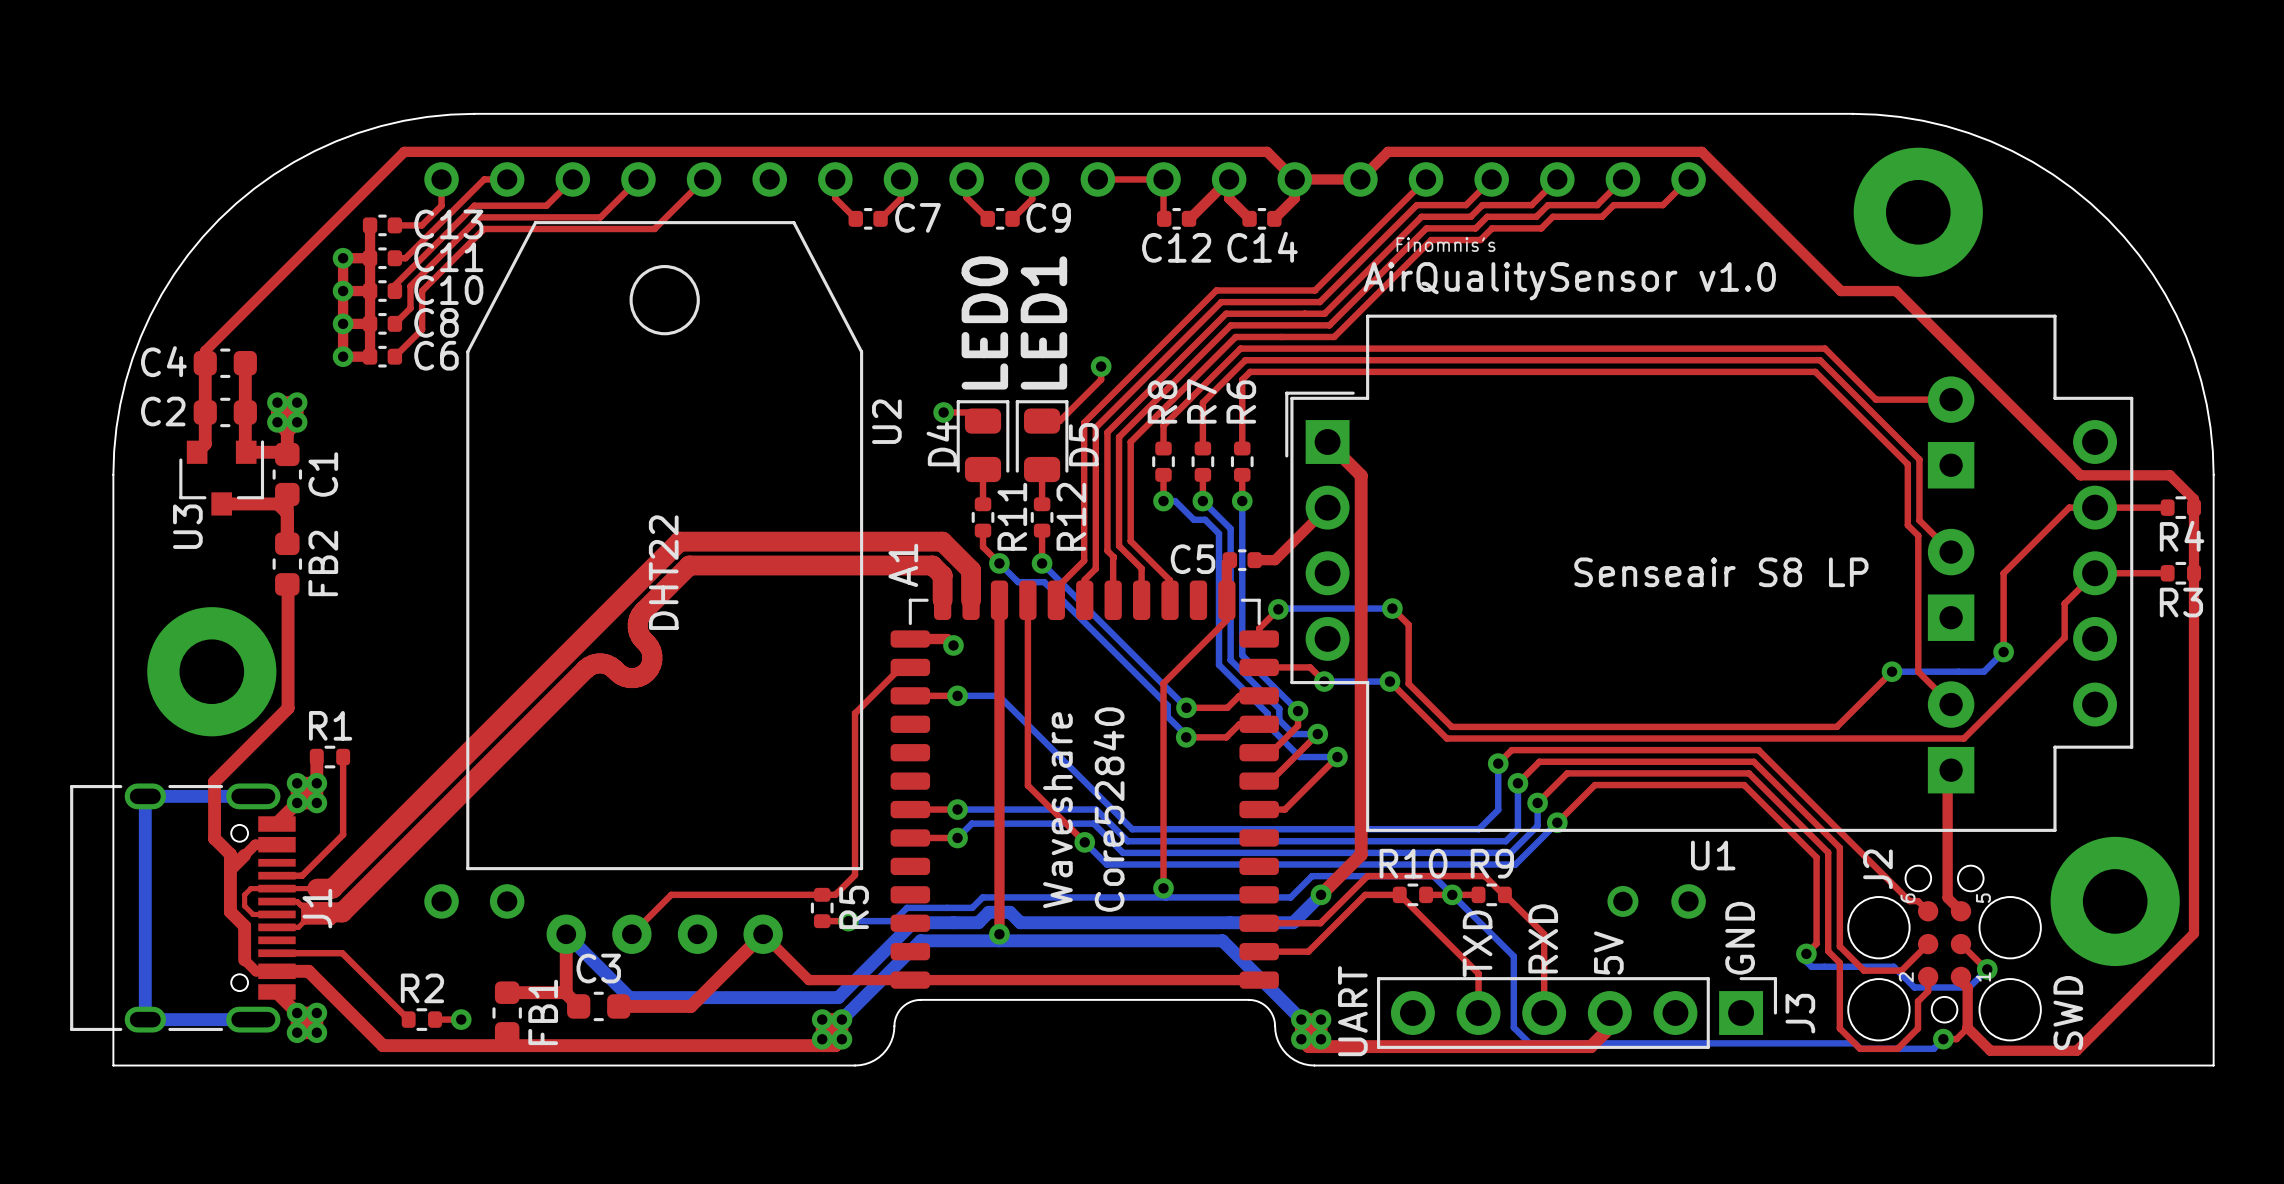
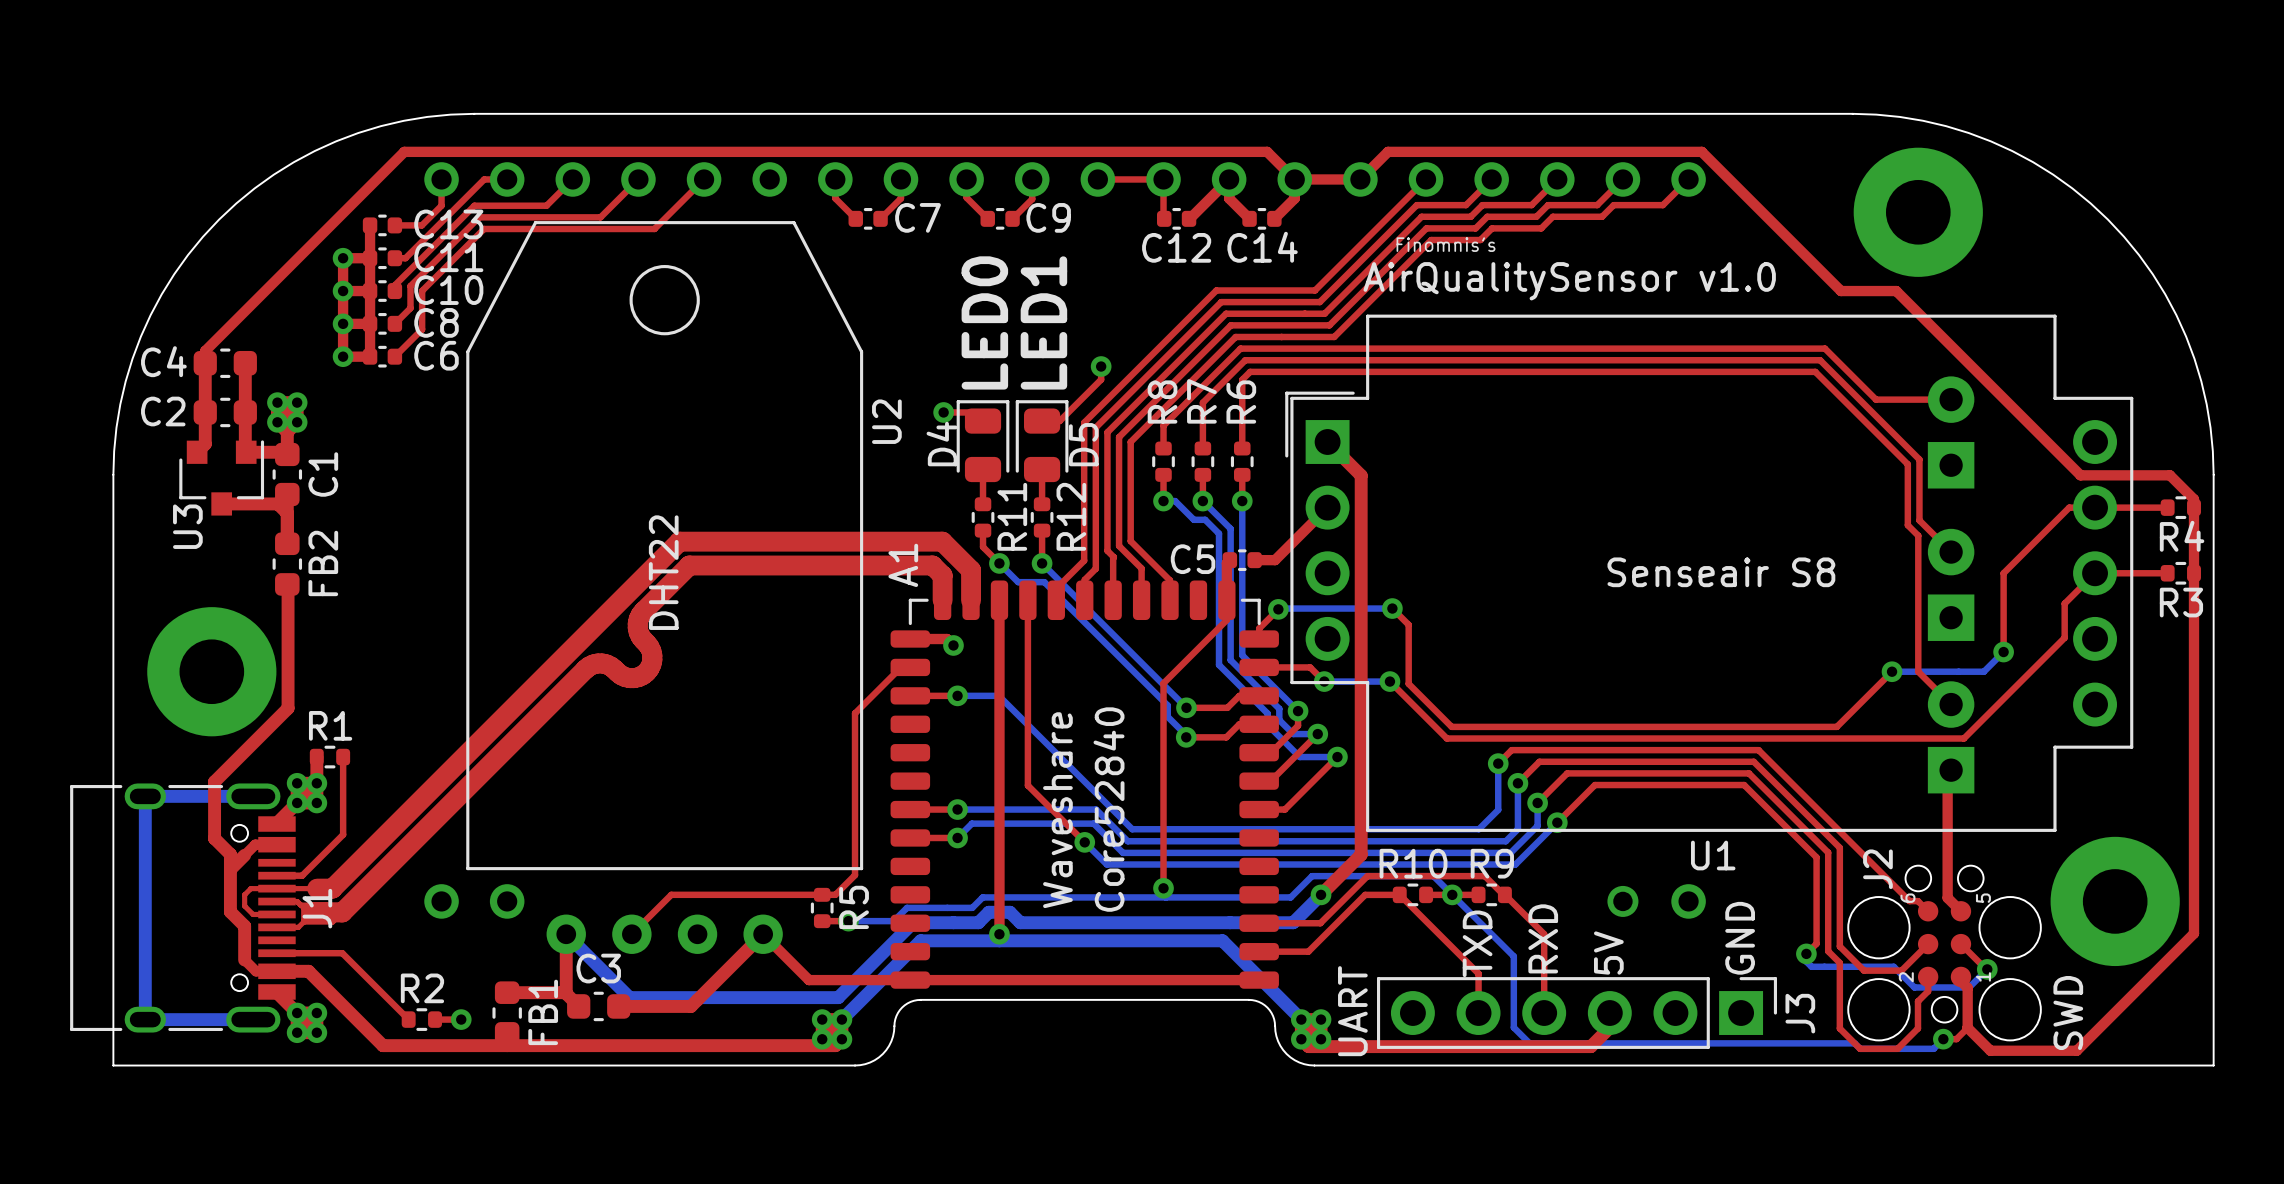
U1 text: Senseair S8 LP (1721, 572) -> Senseair S8 (1721, 572)

